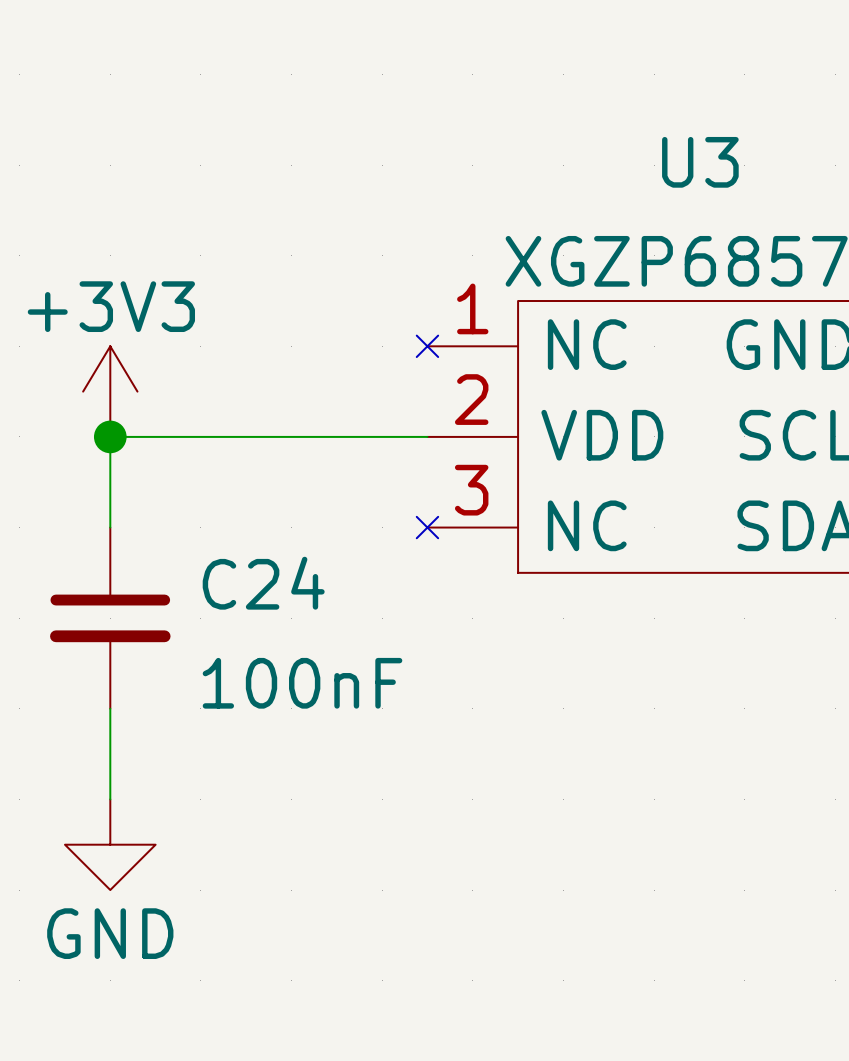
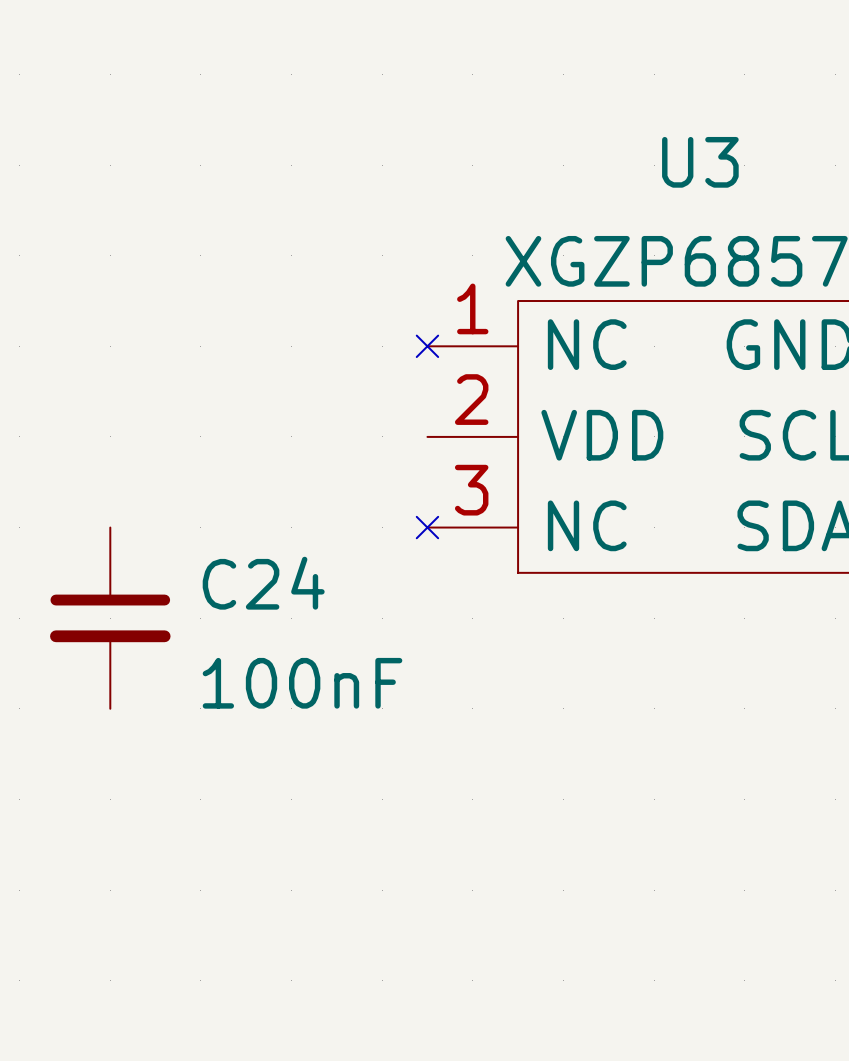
power symbol: +3V3 (110, 391) -> none
junction: (110, 436) -> none
wire: (427, 436) (110, 436) (110, 527) -> none
wire: (110, 708) (110, 799) -> none
power symbol: GND (110, 844) -> none

